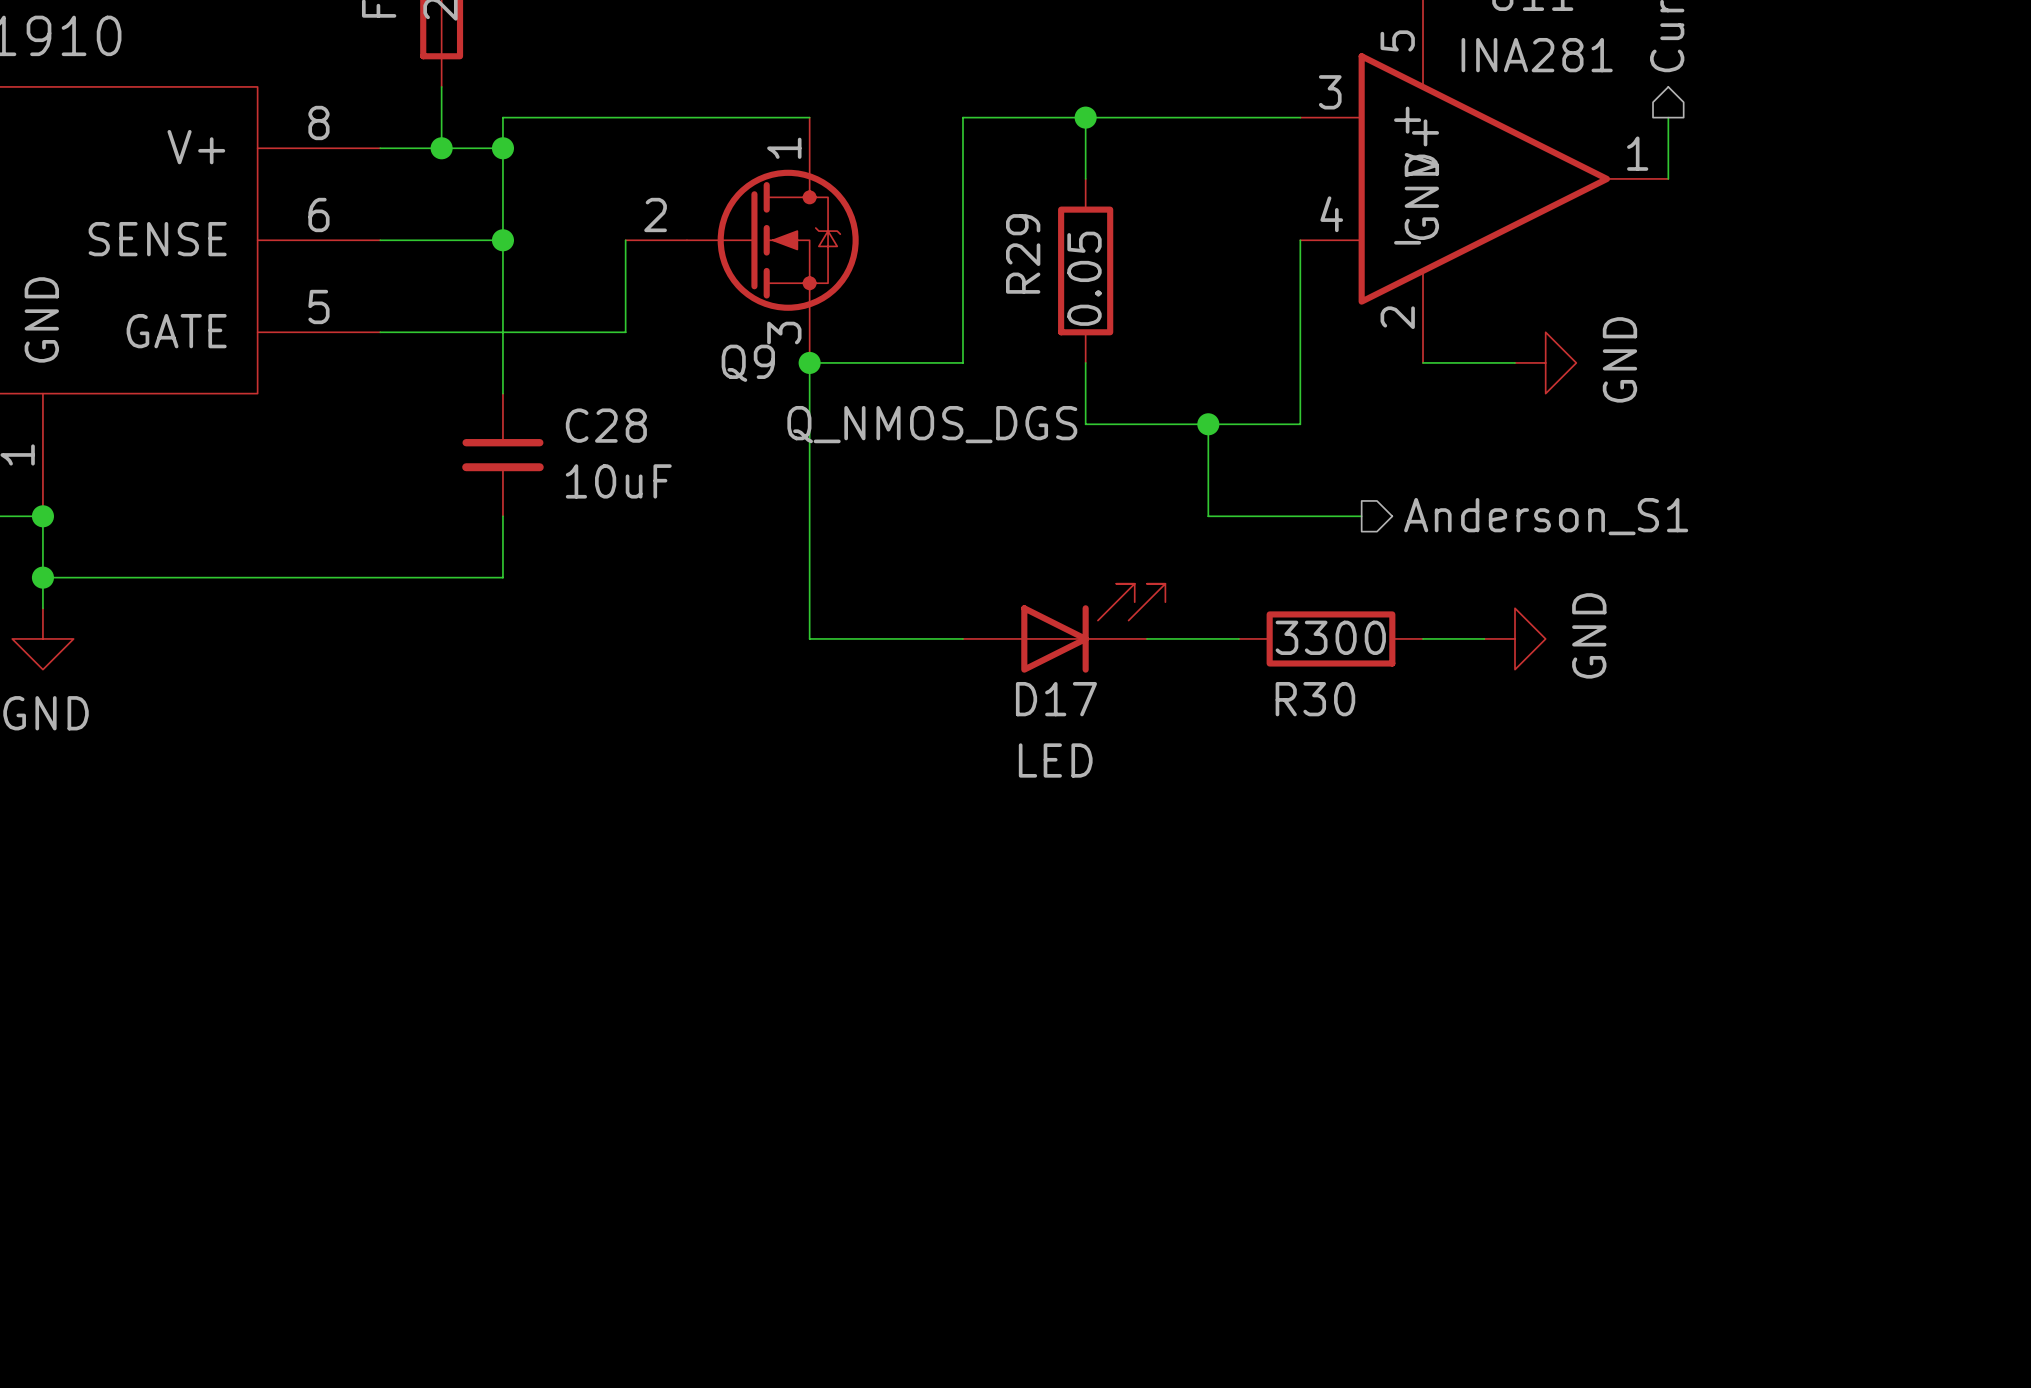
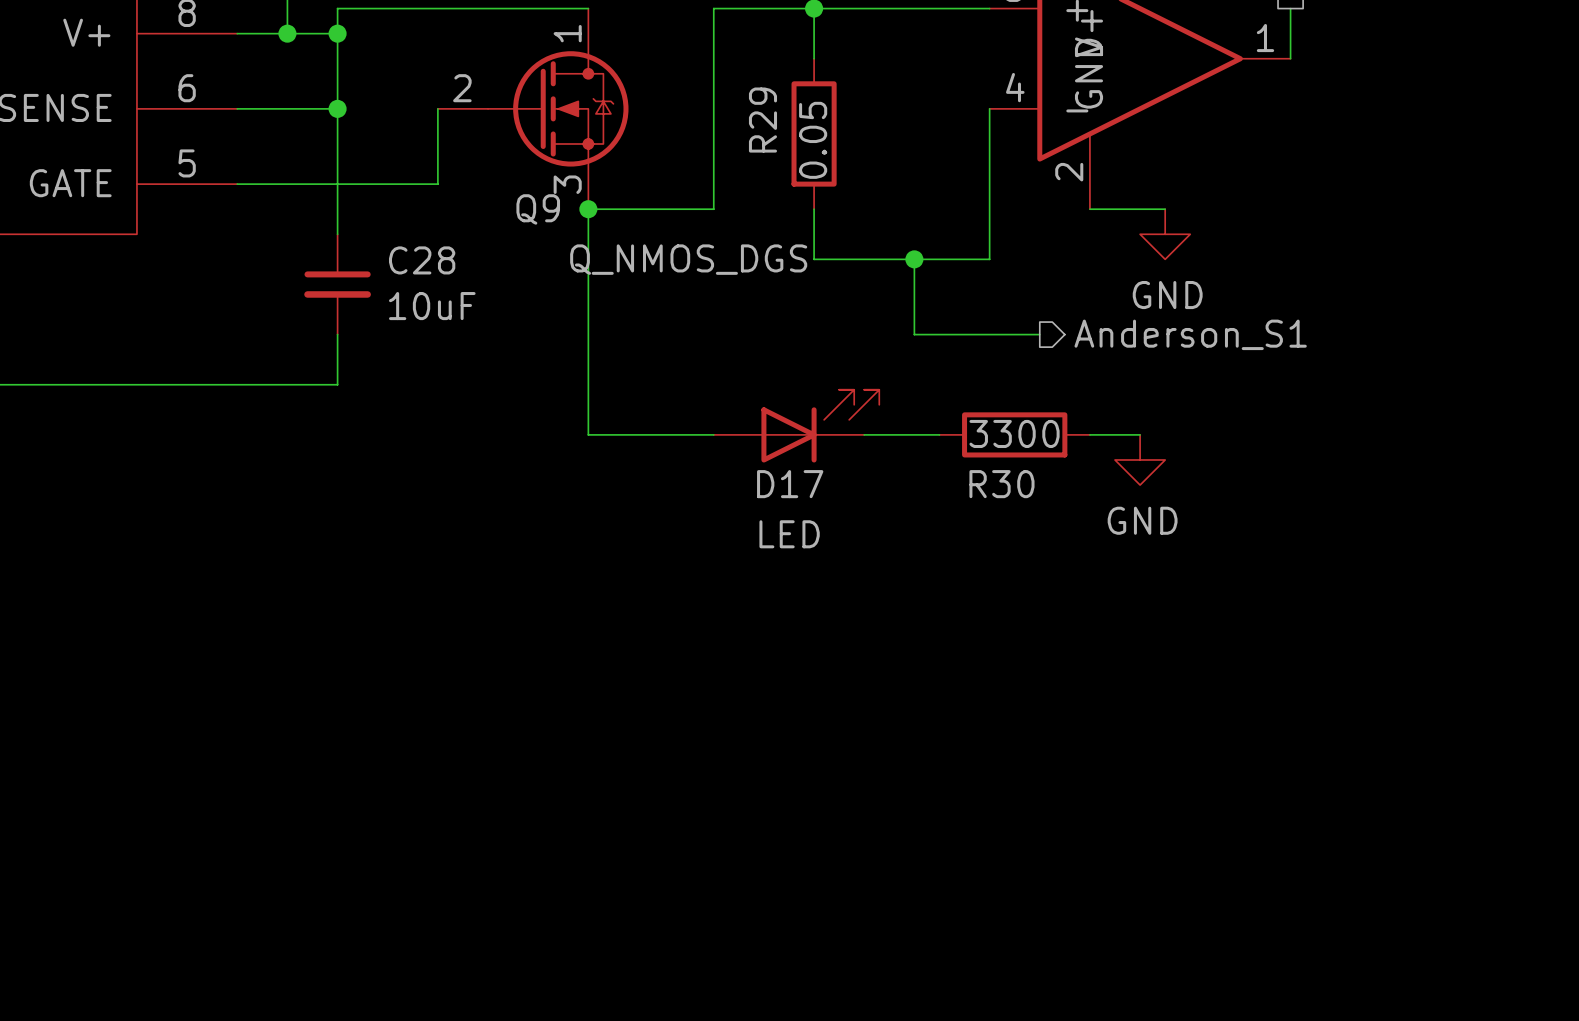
power symbol rotation: 0° (1545, 362) -> 90° clockwise (1165, 234)
power symbol position: GND (1545, 362) -> GND (1165, 234)
power symbol rotation: 0° (1515, 638) -> 90° clockwise (1140, 459)
power symbol position: GND (1515, 638) -> GND (1140, 459)

